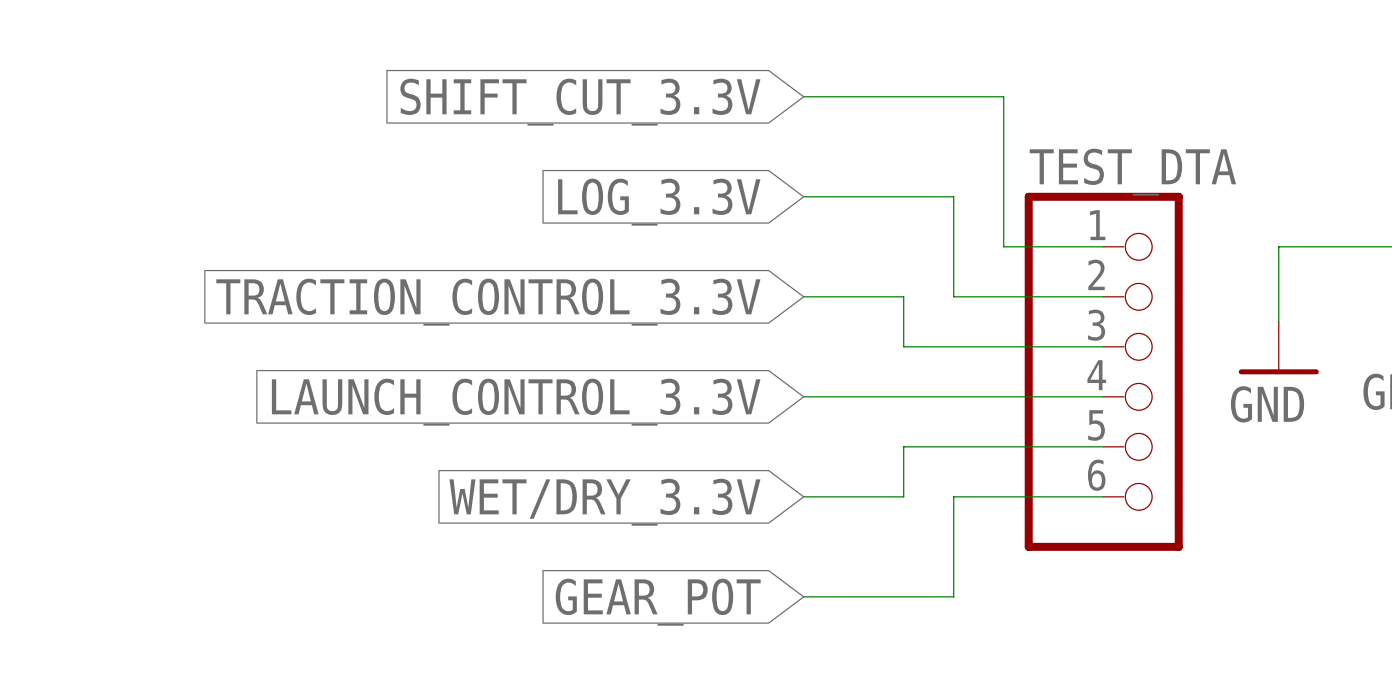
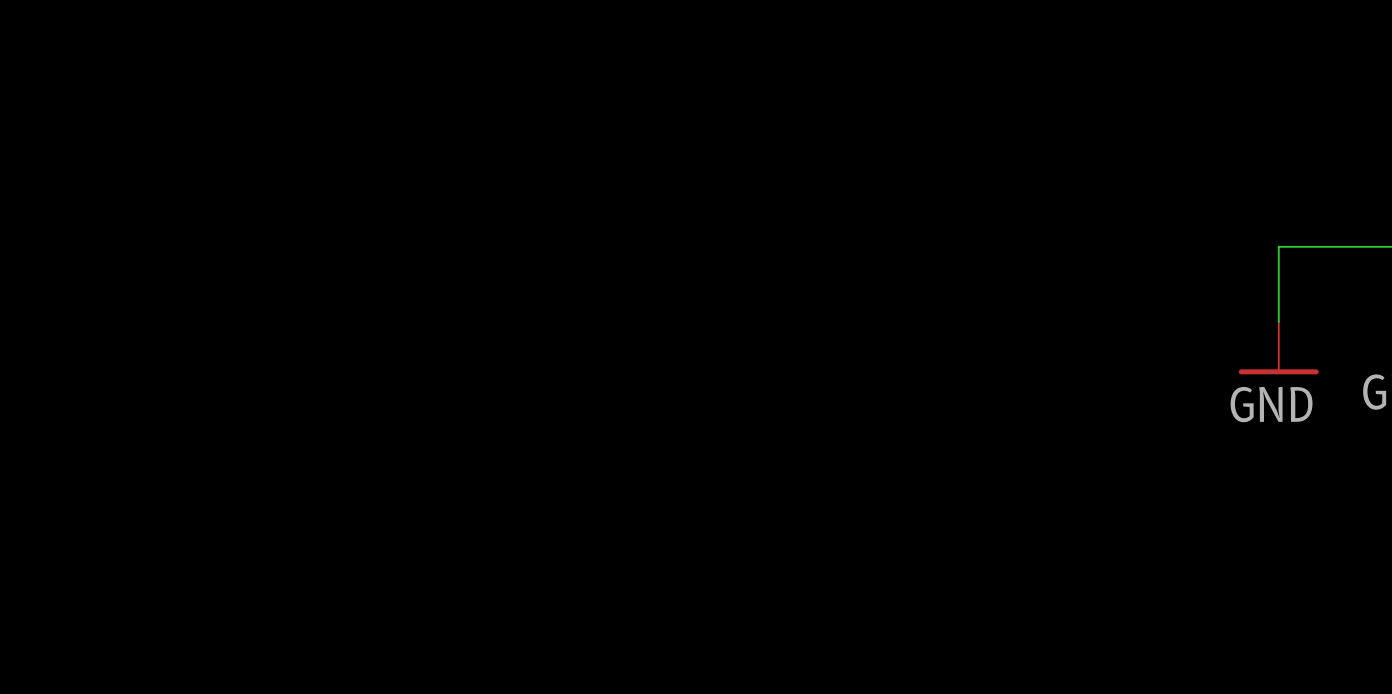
wire: (803, 96) (1003, 96) (1003, 246) (1103, 246) -> none
global label: SHIFT_CUT_3.3V (580, 102) -> none
wire: (803, 196) (953, 196) (953, 296) (1103, 296) -> none
global label: LOG_3.3V (659, 202) -> none
wire: (803, 296) (903, 296) (903, 346) (1103, 346) -> none
global label: TRACTION_CONTROL_3.3V (488, 302) -> none
TEST_DTA: (1103, 371) -> none
wire: (803, 396) (1103, 396) -> none
global label: LAUNCH_CONTROL_3.3V (516, 402) -> none
wire: (1103, 446) (903, 446) (903, 496) (803, 496) -> none
wire: (1103, 496) (953, 496) (953, 596) (803, 596) -> none
global label: WET/DRY_3.3V (604, 502) -> none
global label: GEAR_POT (658, 602) -> none

